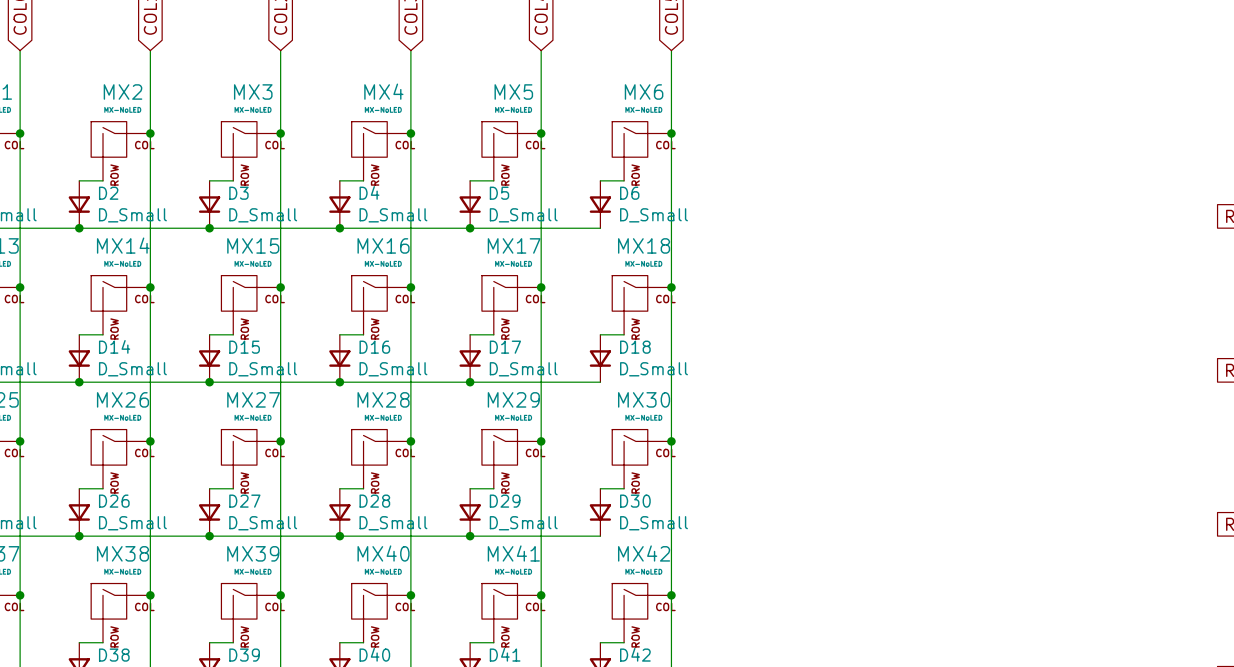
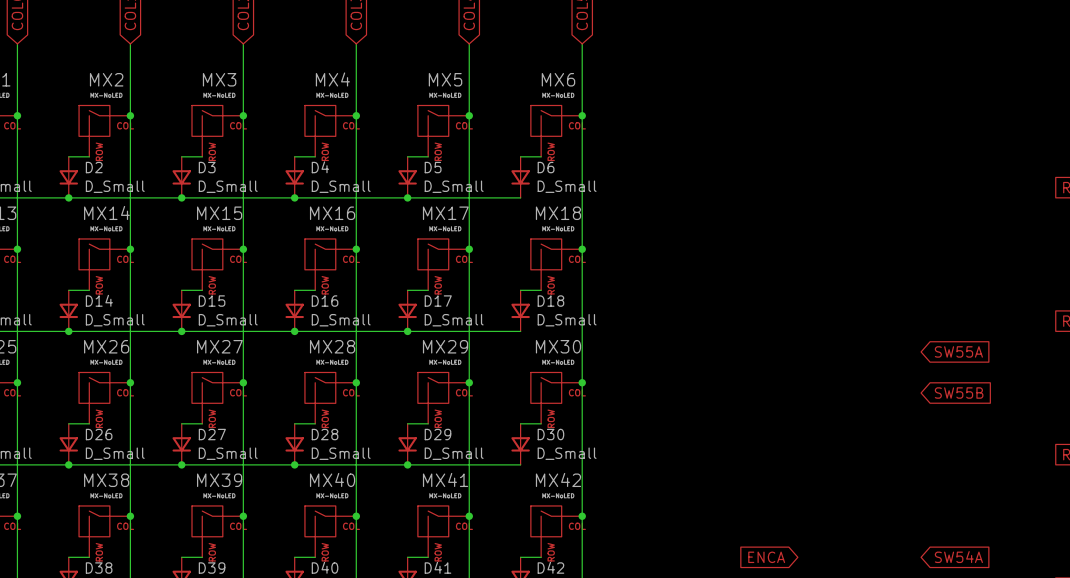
global label: none -> SW55A (958, 351)
global label: none -> SW55B (959, 393)
global label: none -> ENCA (766, 557)
global label: none -> SW54A (958, 557)

